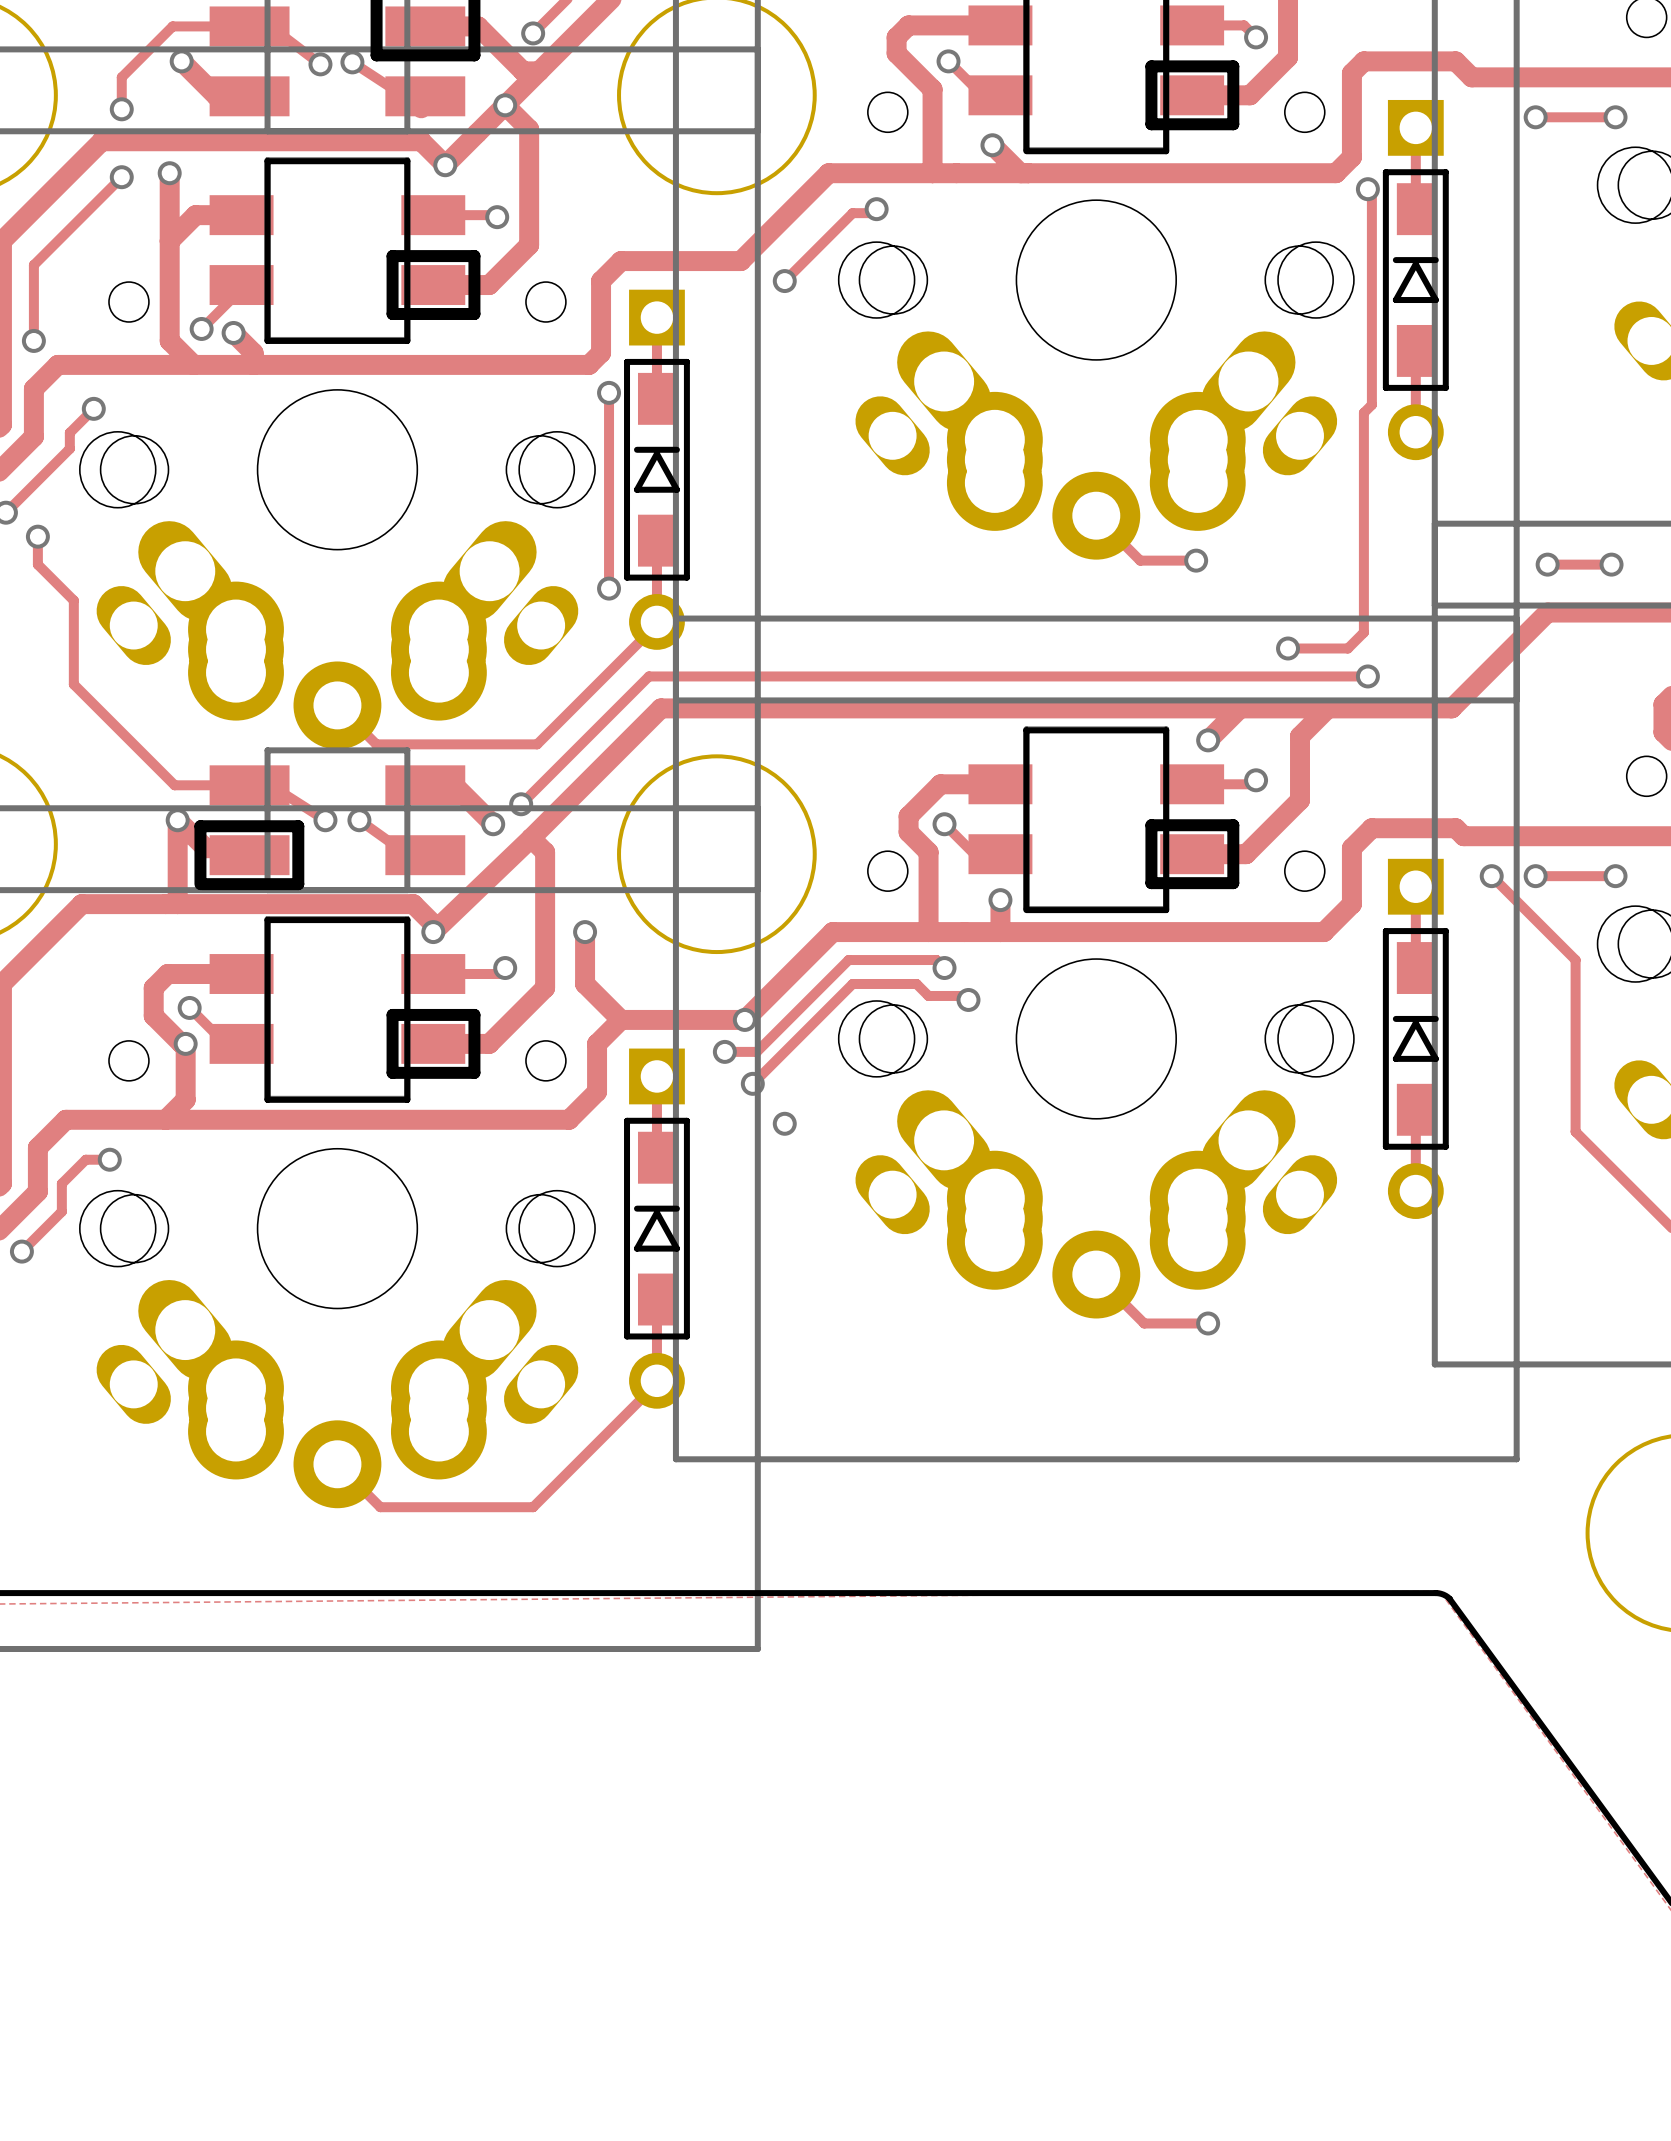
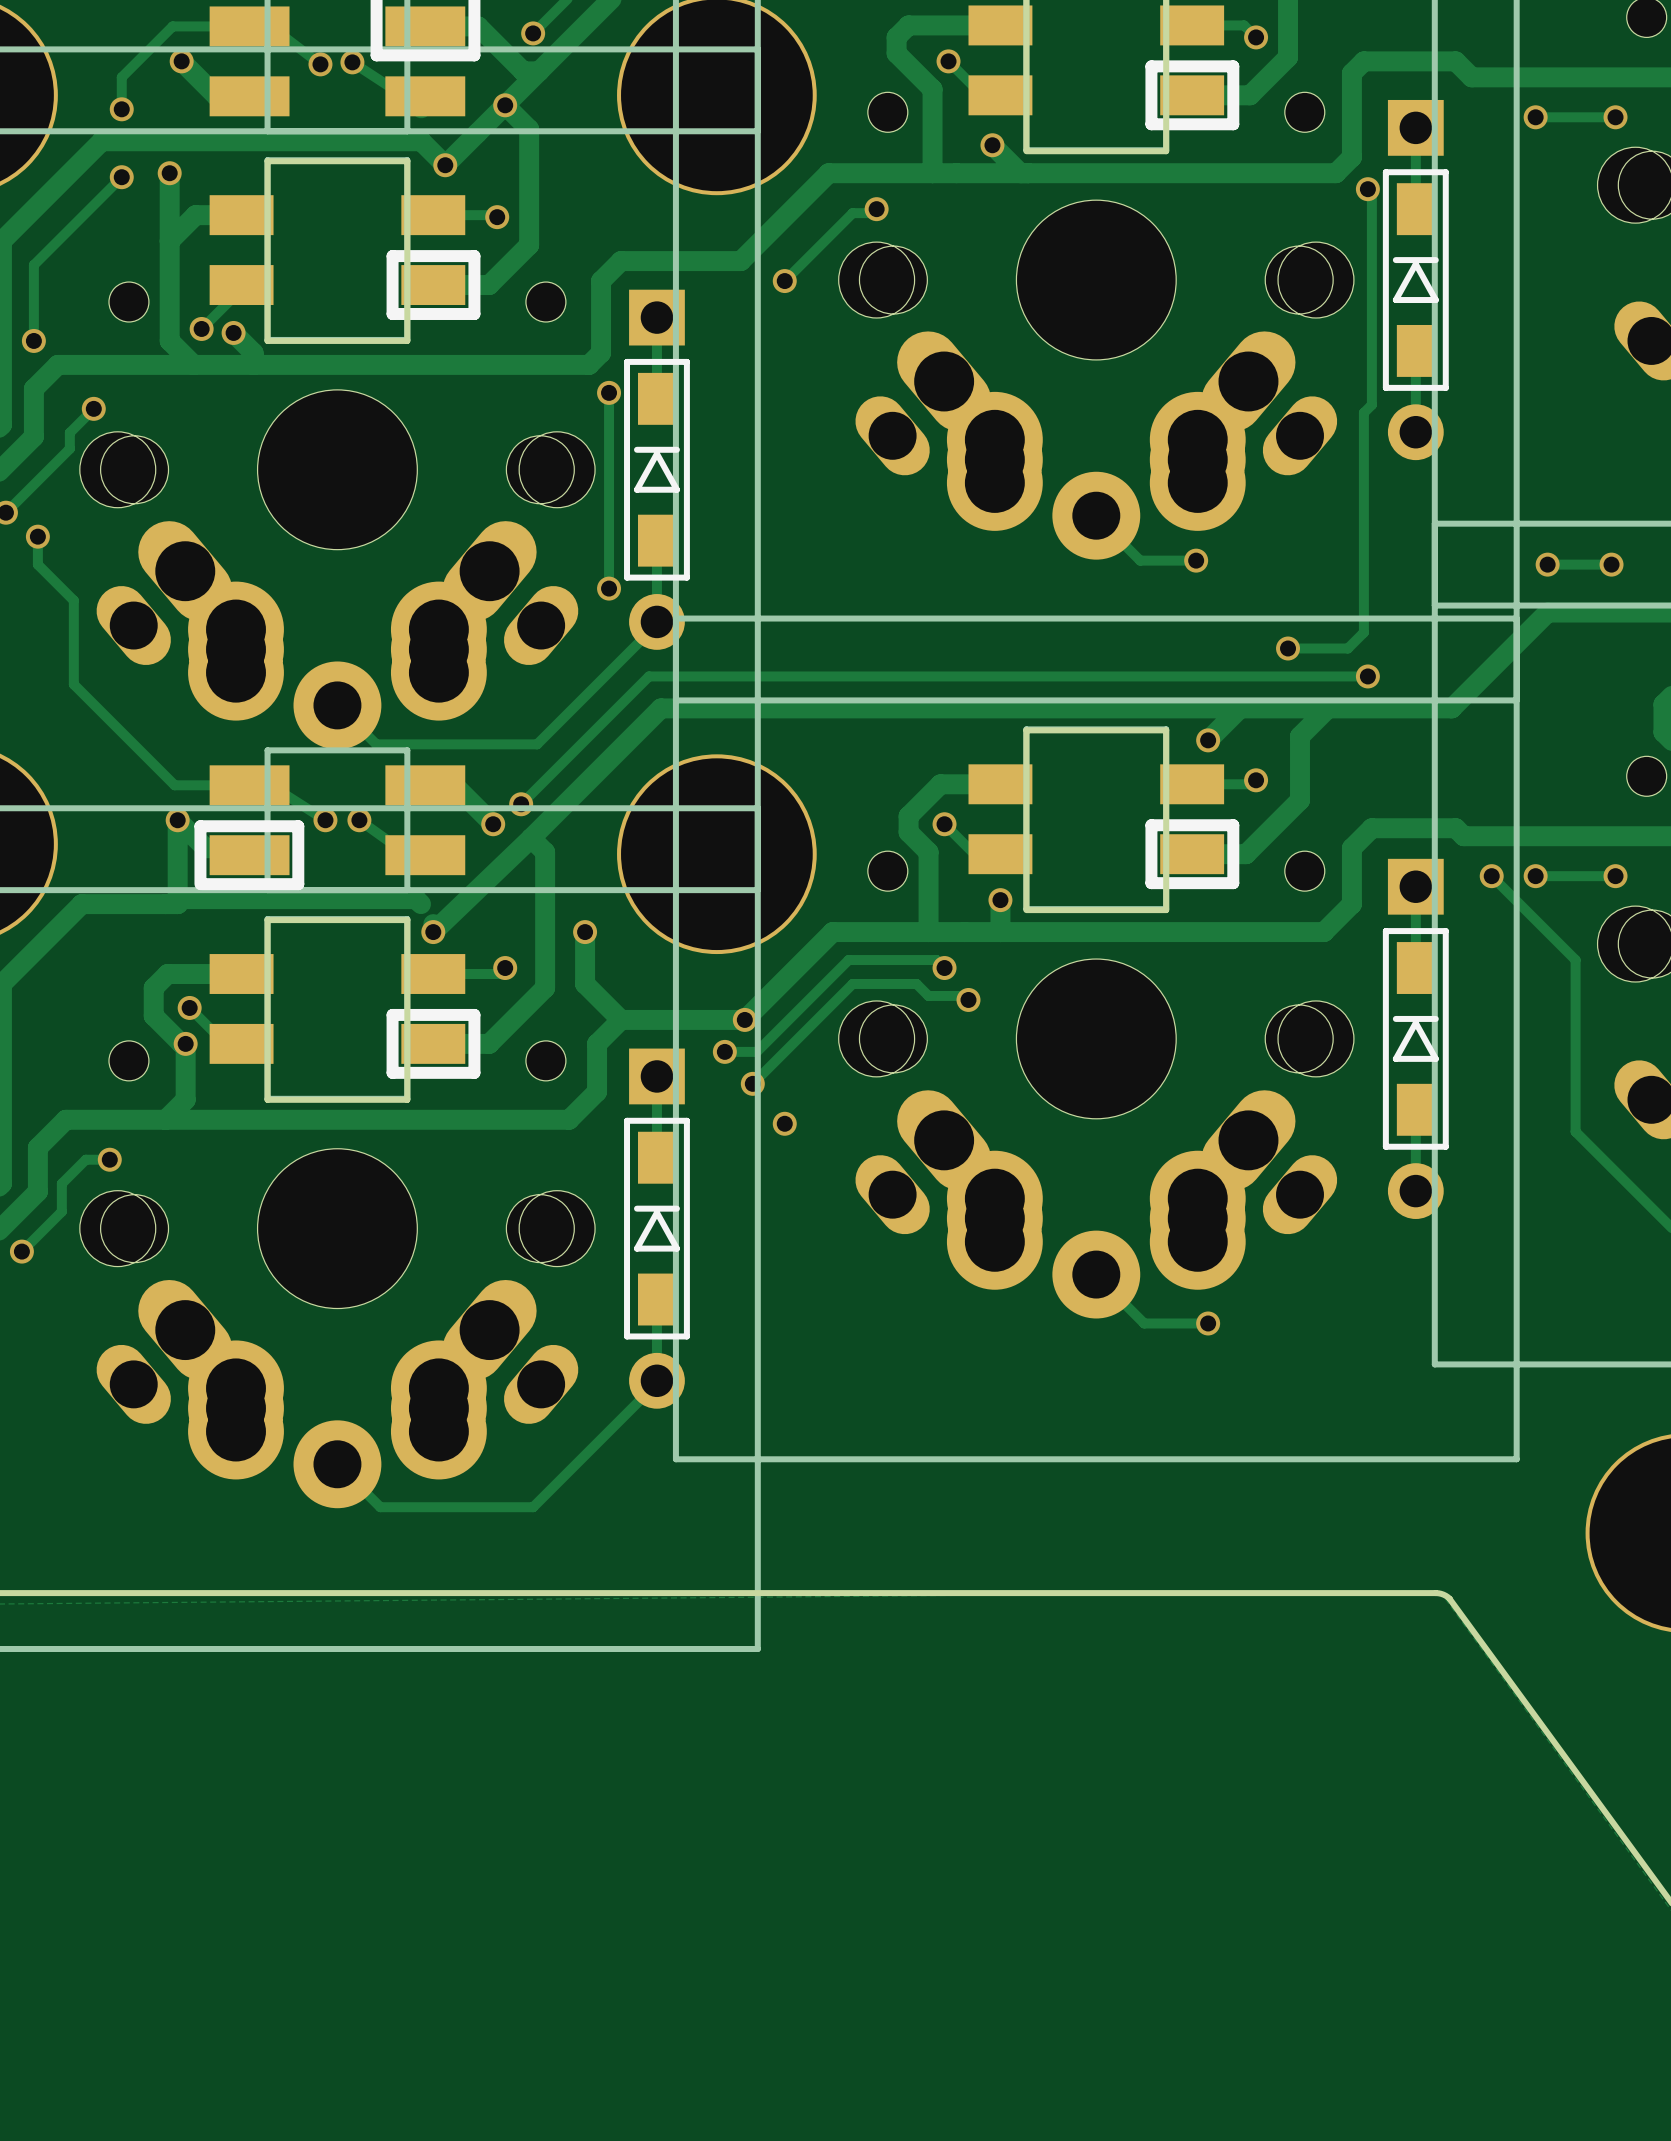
track: (177, 904) (413, 904) (433, 924) -> (177, 904) (182, 899) (416, 899) (421, 904)

